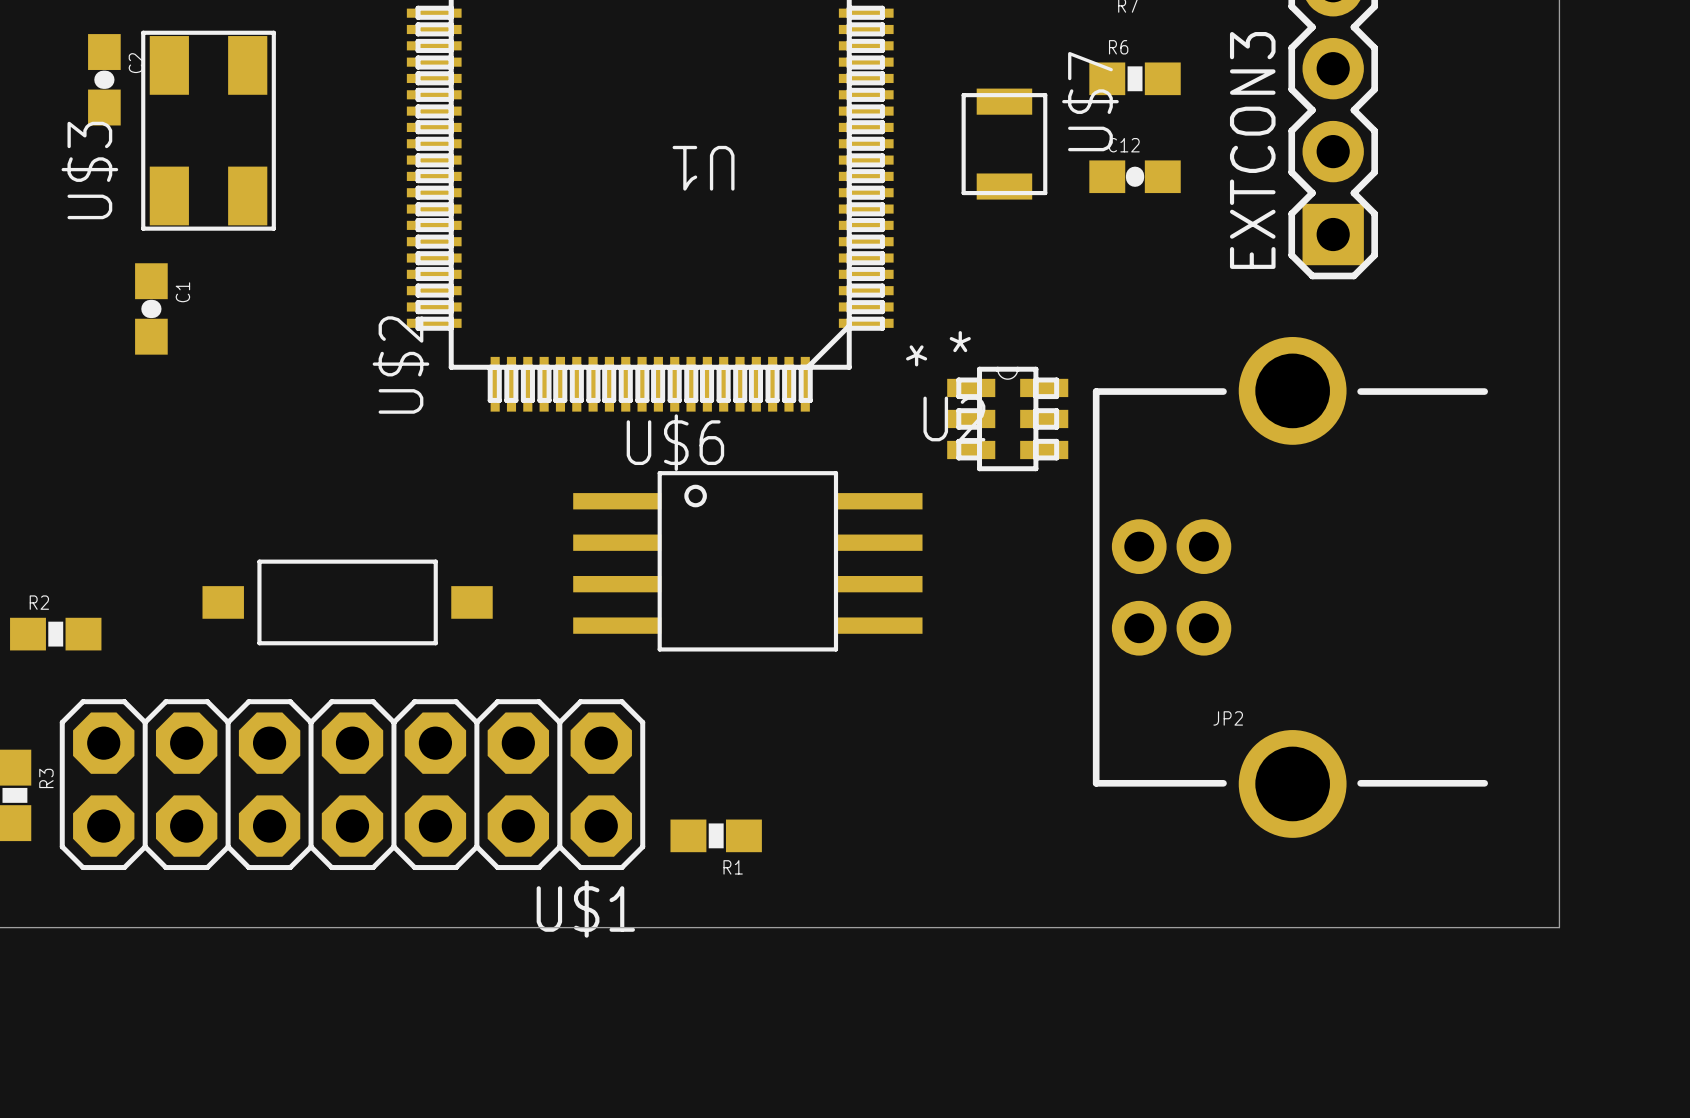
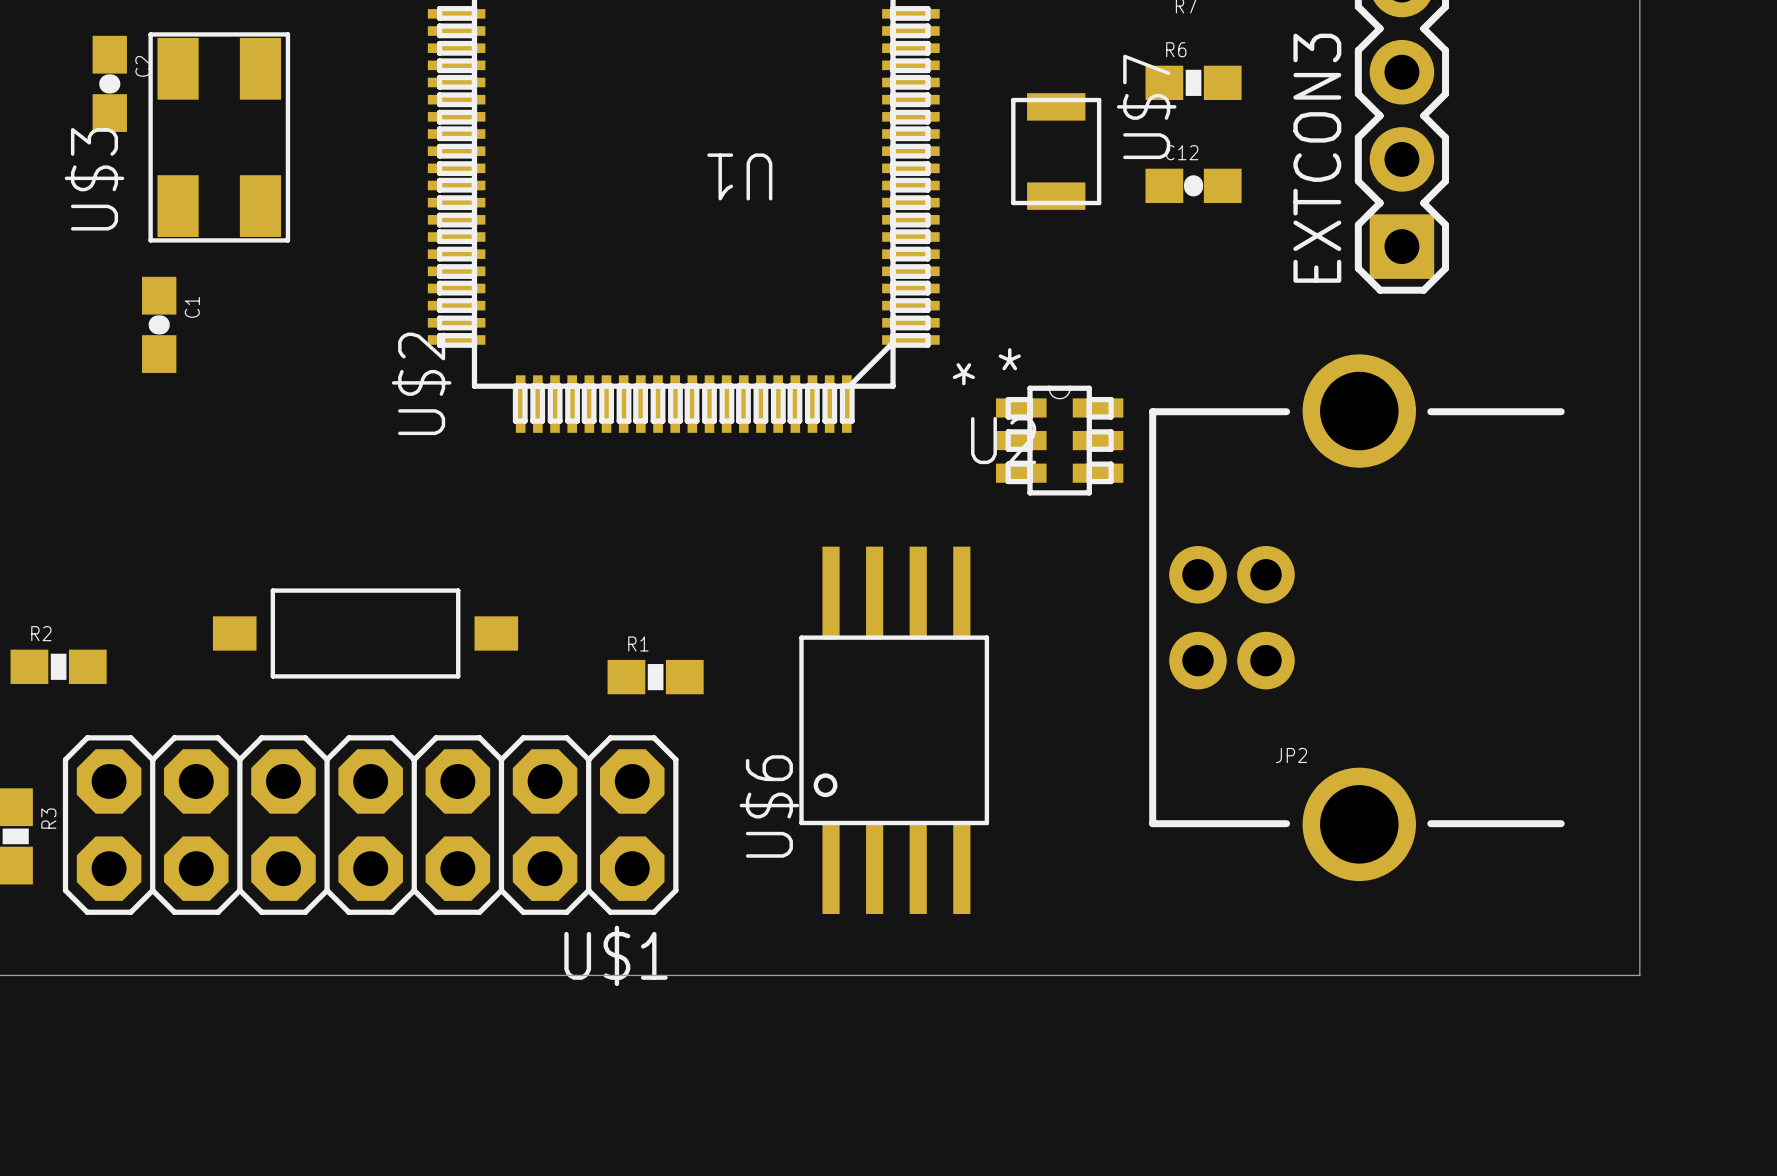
U$6 rotation: 0° (747, 561) -> 90° counterclockwise (894, 730)
R1 position: (716, 835) -> (655, 677)
R1 name position: R1 (733, 867) -> R1 (638, 643)

